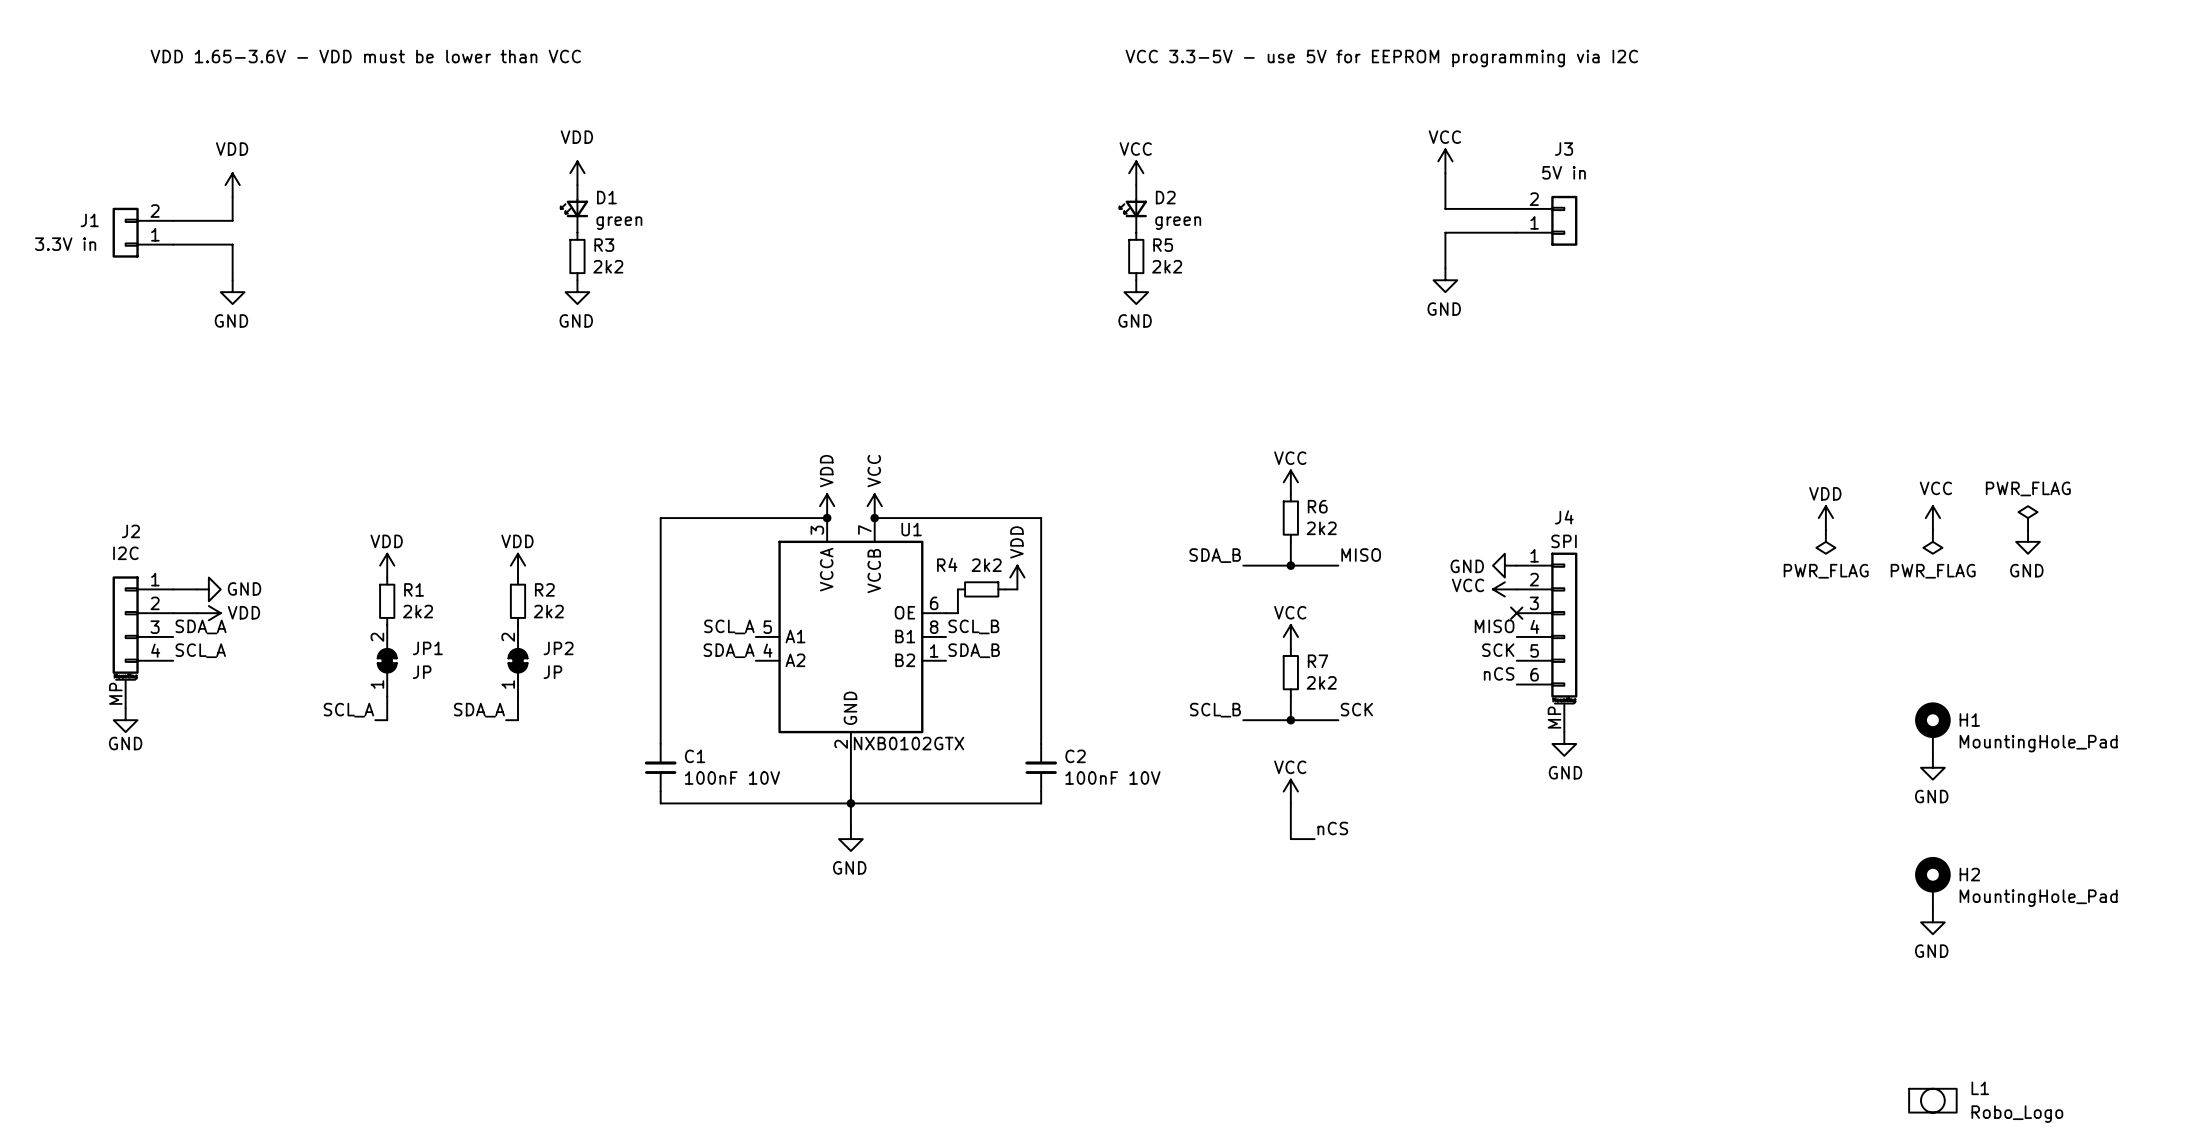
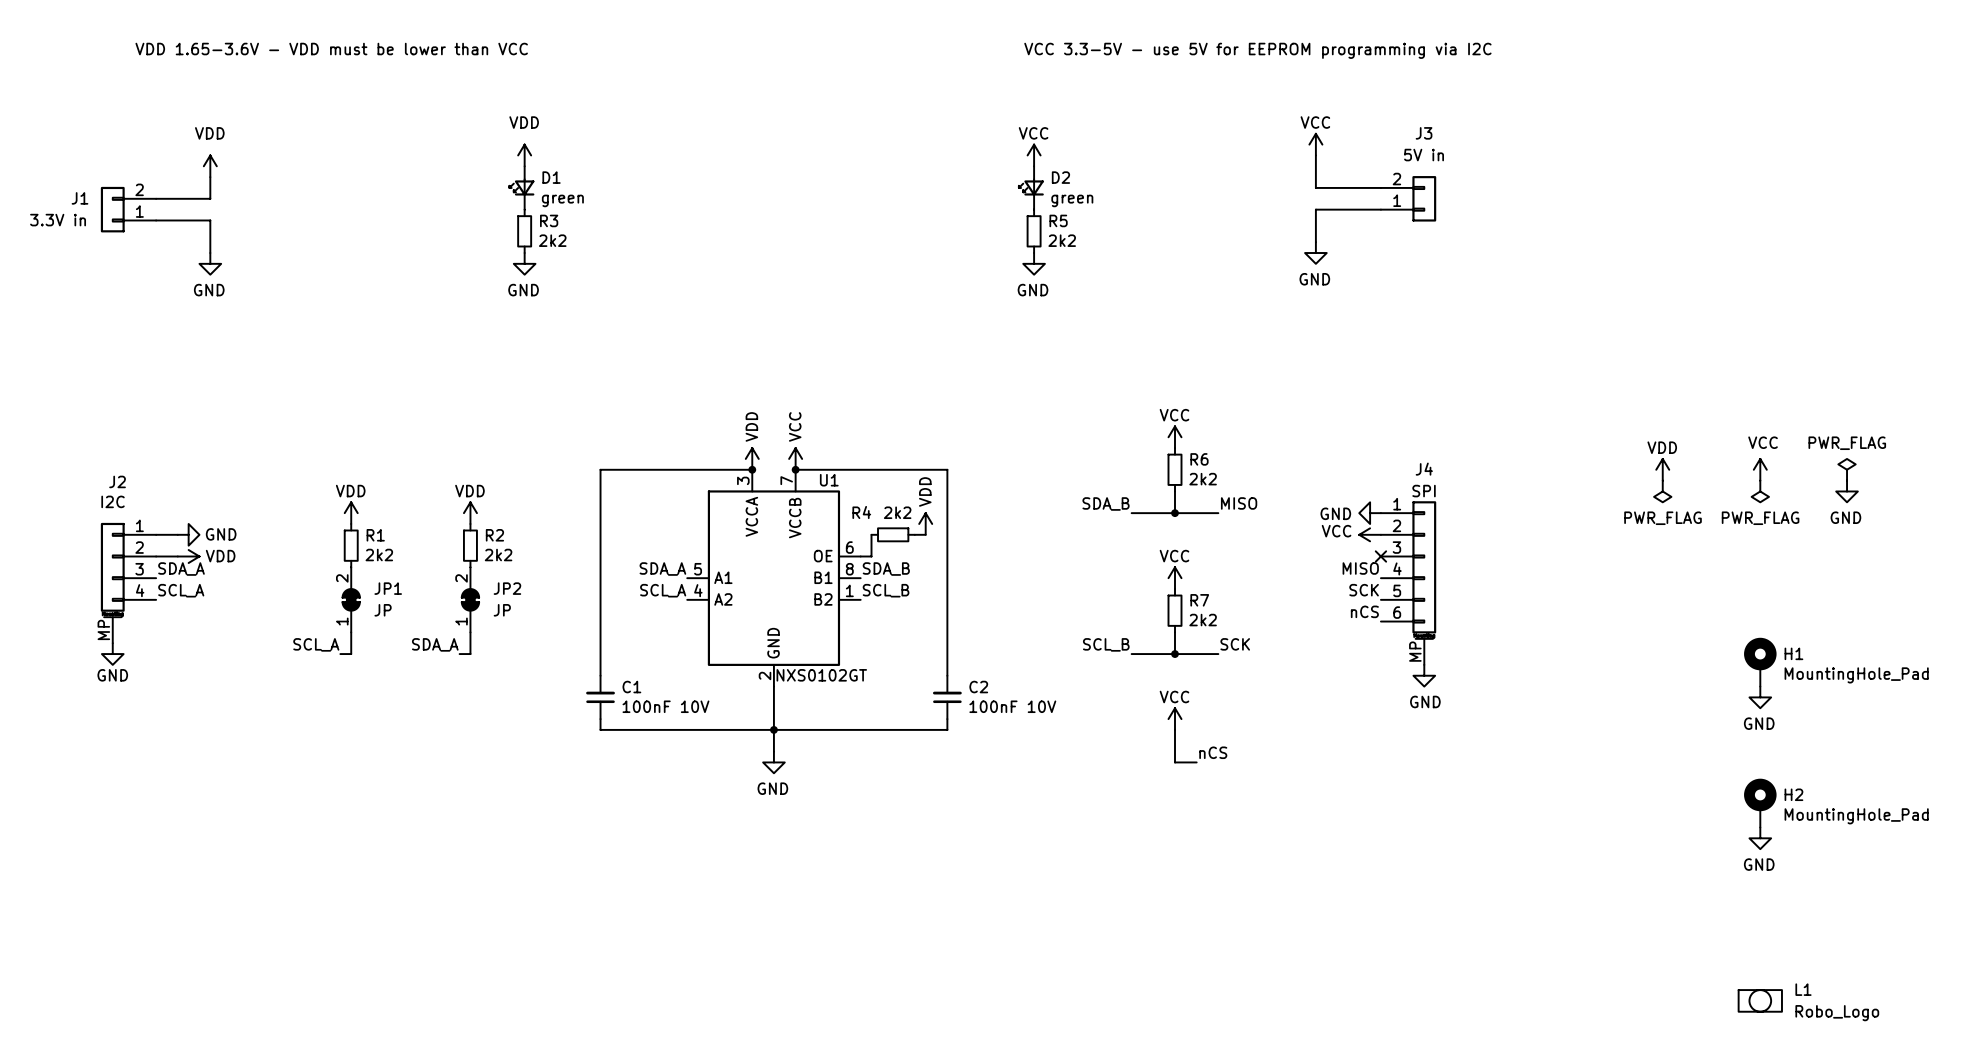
label: SCL_A (729, 626) -> SDA_A (662, 569)
label: SCL_B (973, 626) -> SDA_B (886, 569)
label: SDA_A (729, 650) -> SCL_A (663, 590)
label: SDA_B (974, 650) -> SCL_B (886, 590)
U1 value: NXB0102GTX (909, 743) -> NXS0102GT (821, 675)

